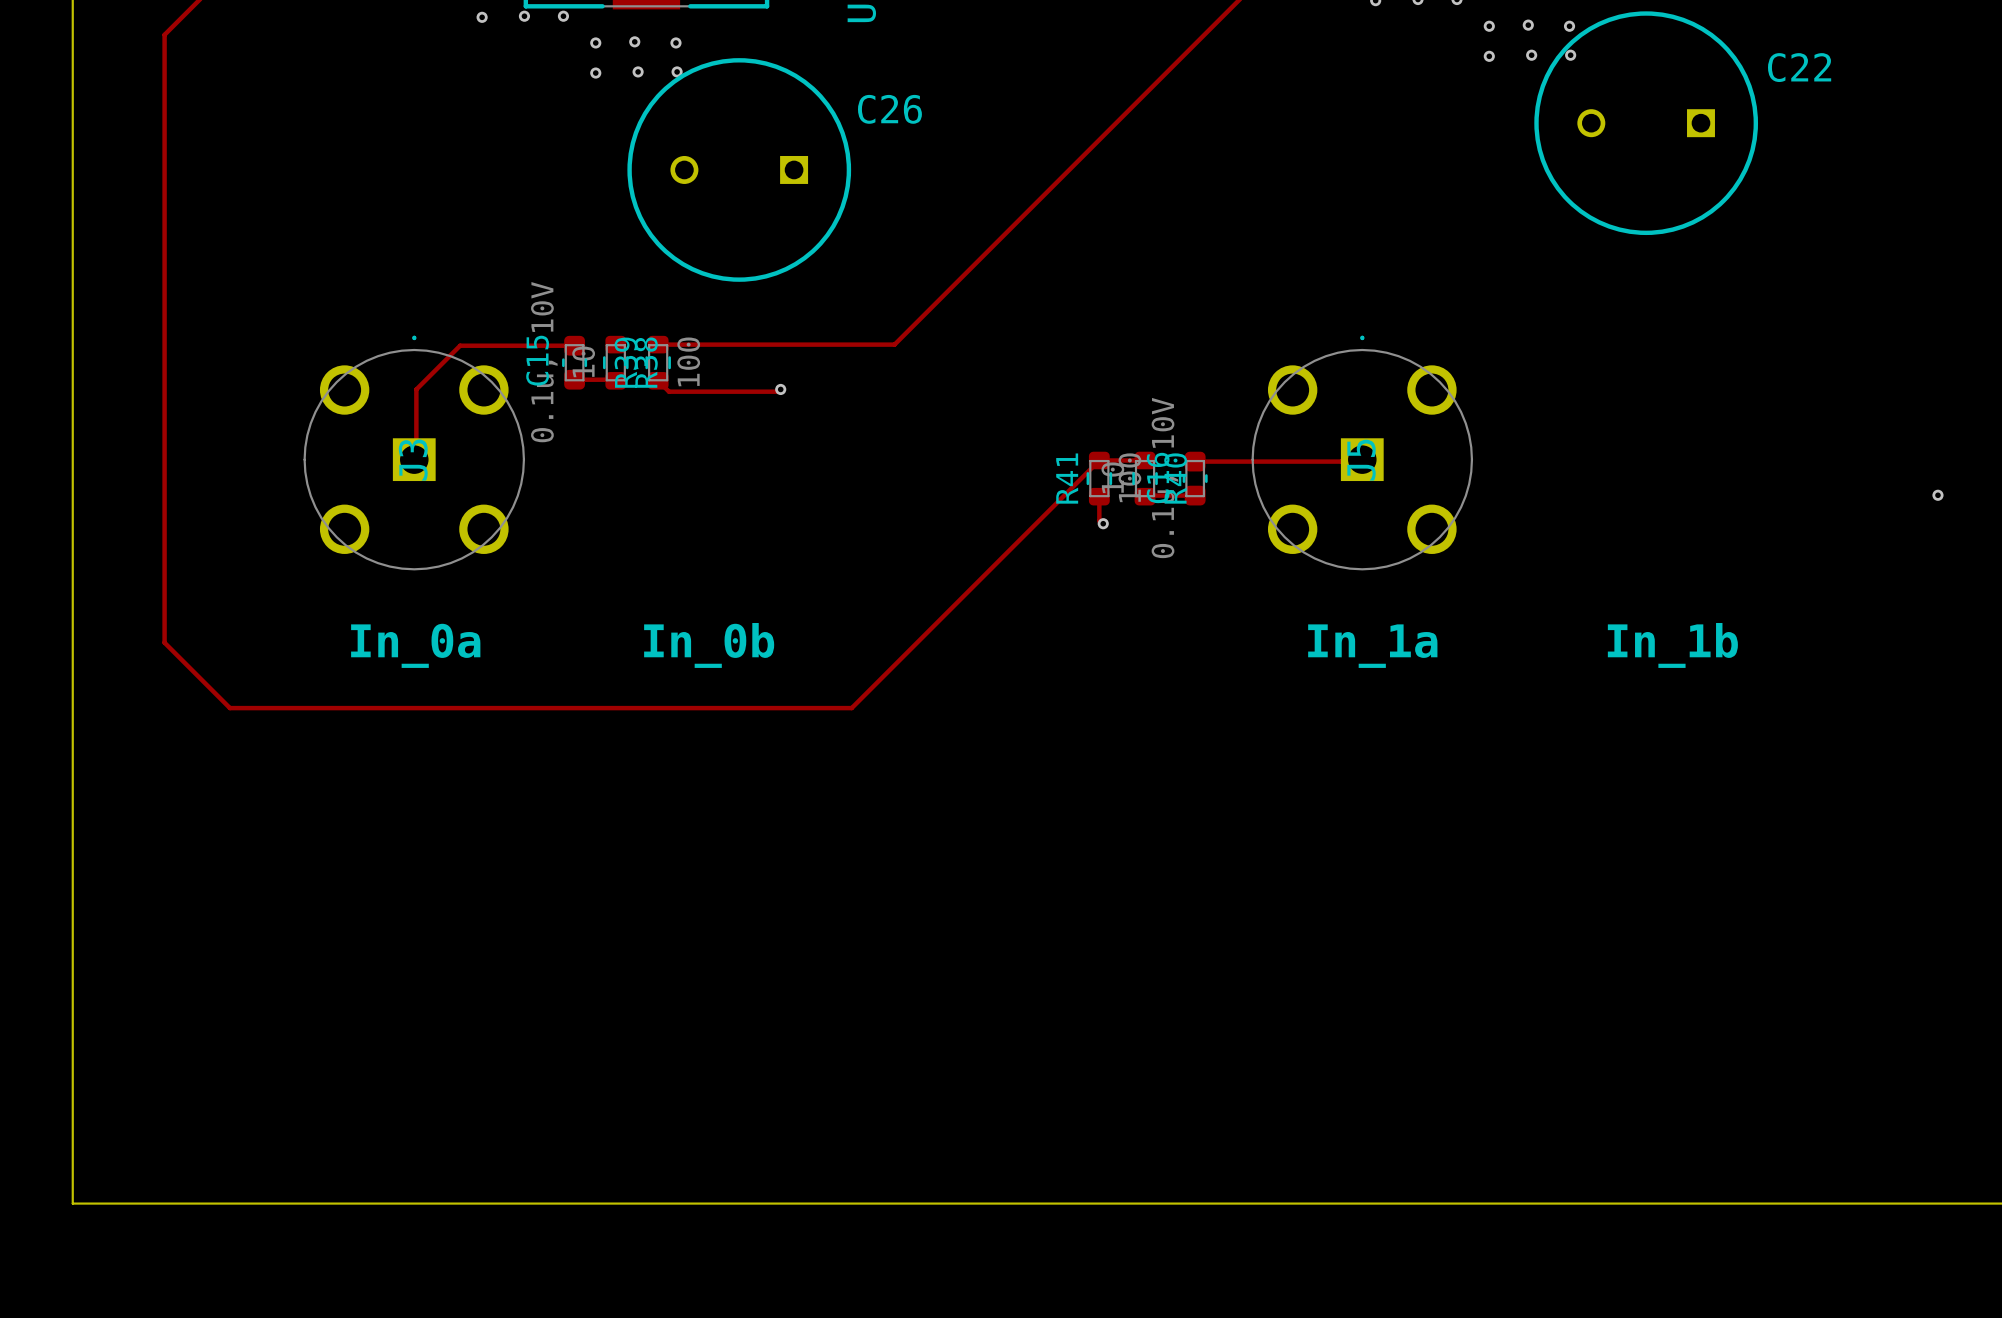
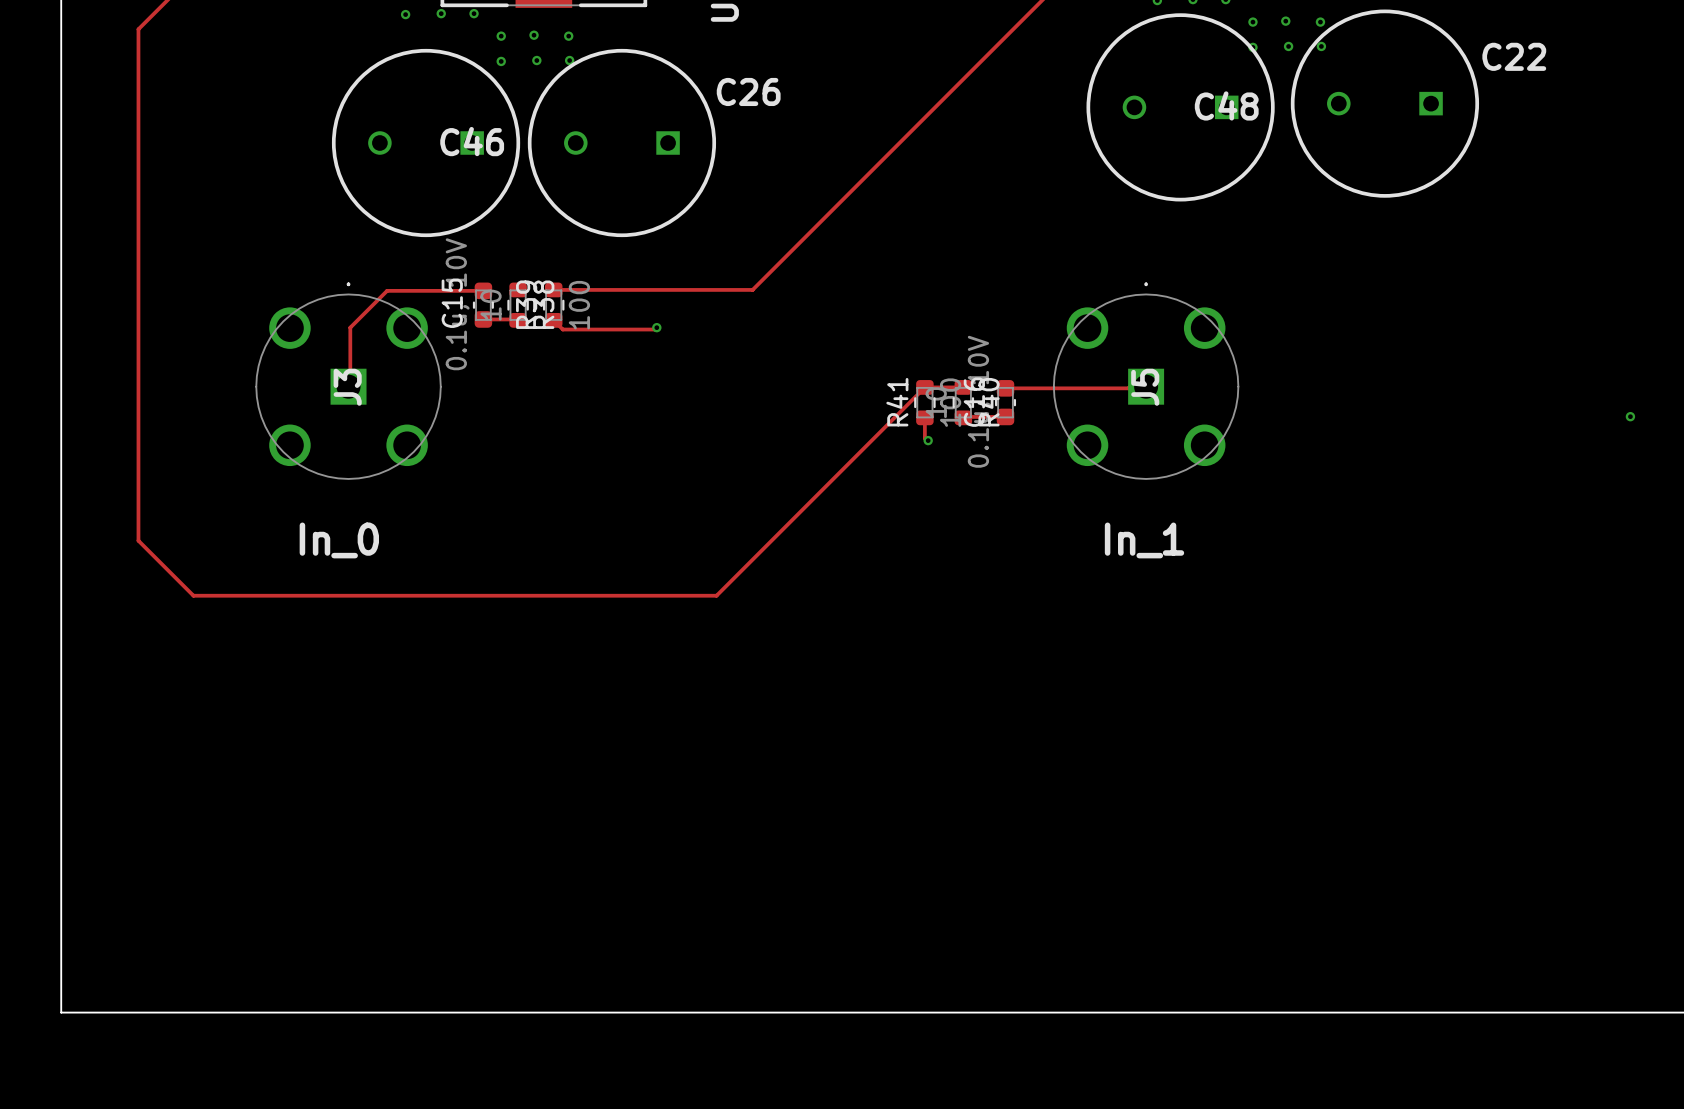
C48: none -> (1180, 107)
C46: none -> (426, 143)
text: In_0a (415, 645) -> In_0 (339, 540)
text: In_0b (709, 645) -> none
text: In_1b (1672, 645) -> none
text: In_1a (1372, 646) -> In_1 (1144, 540)

